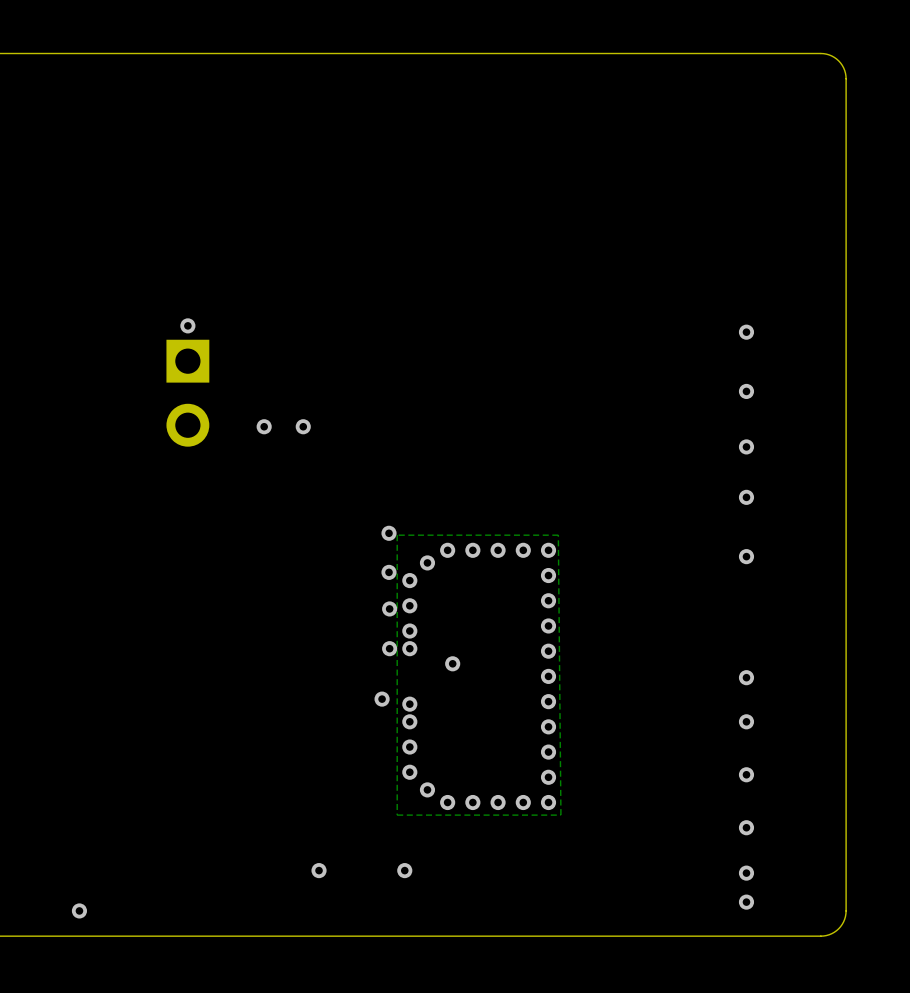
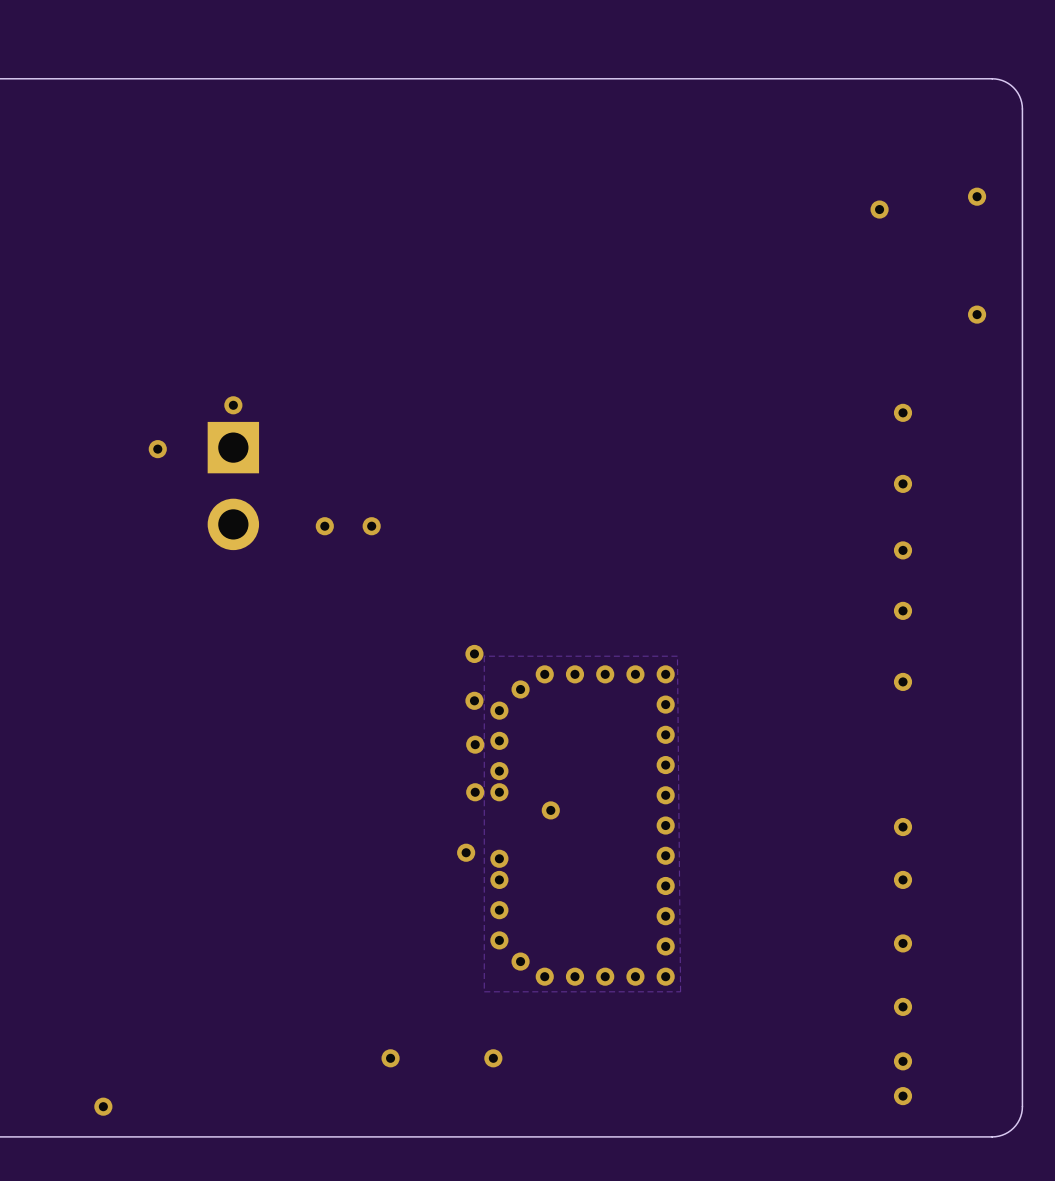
via: none -> (977, 196)
via: none -> (879, 209)
via: none -> (977, 314)
via: none -> (157, 449)

